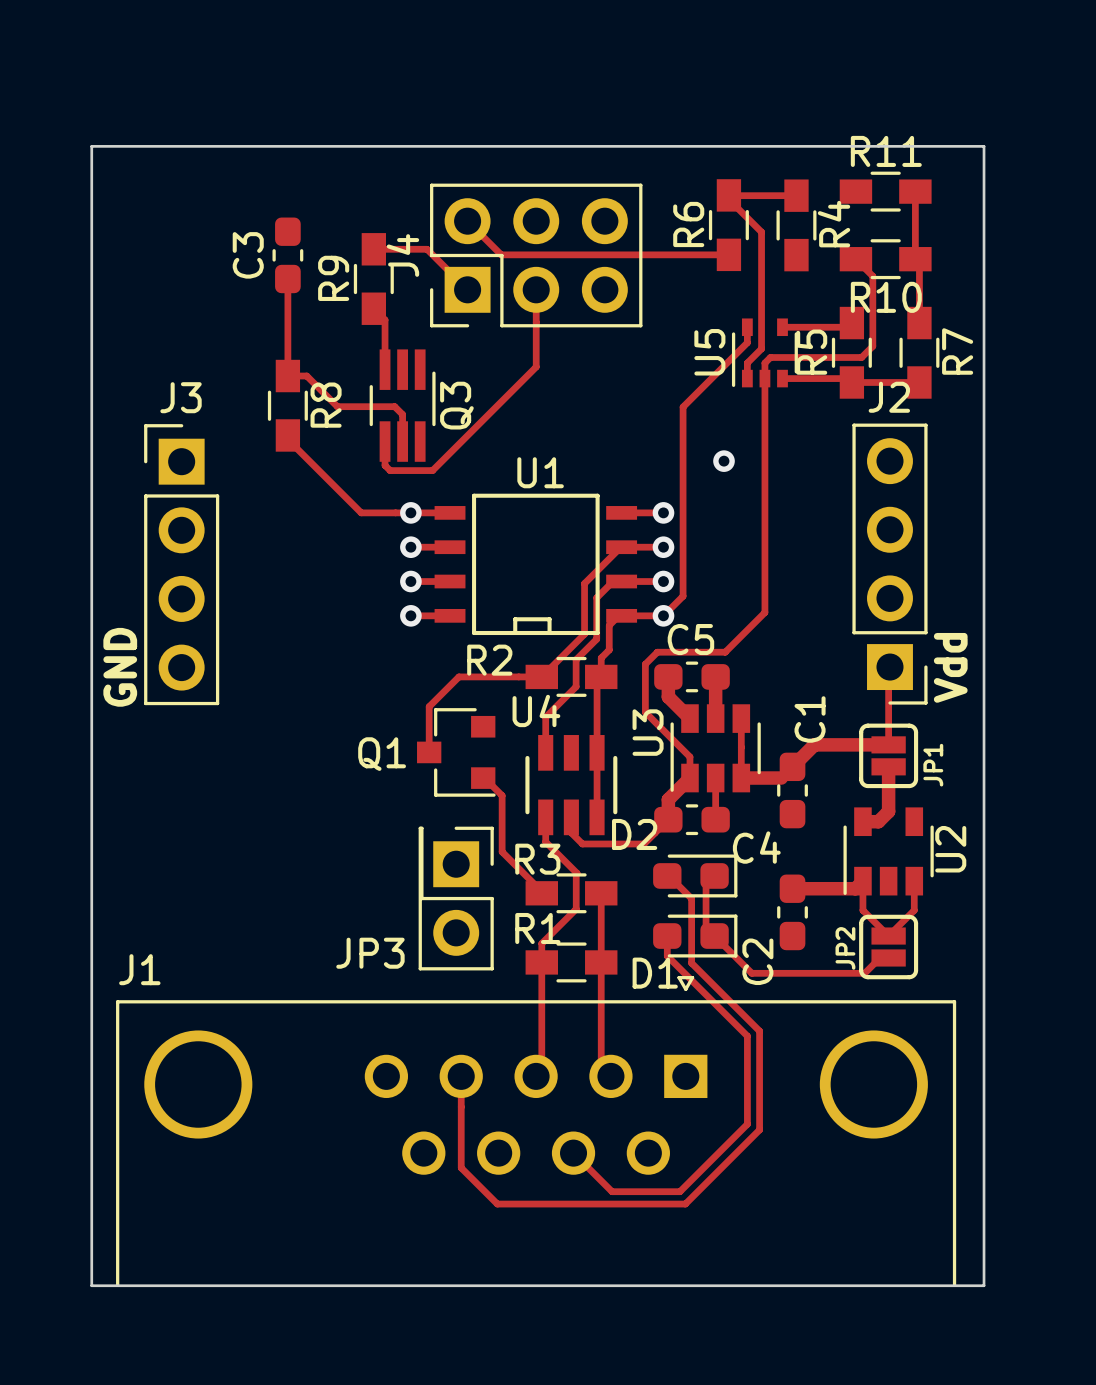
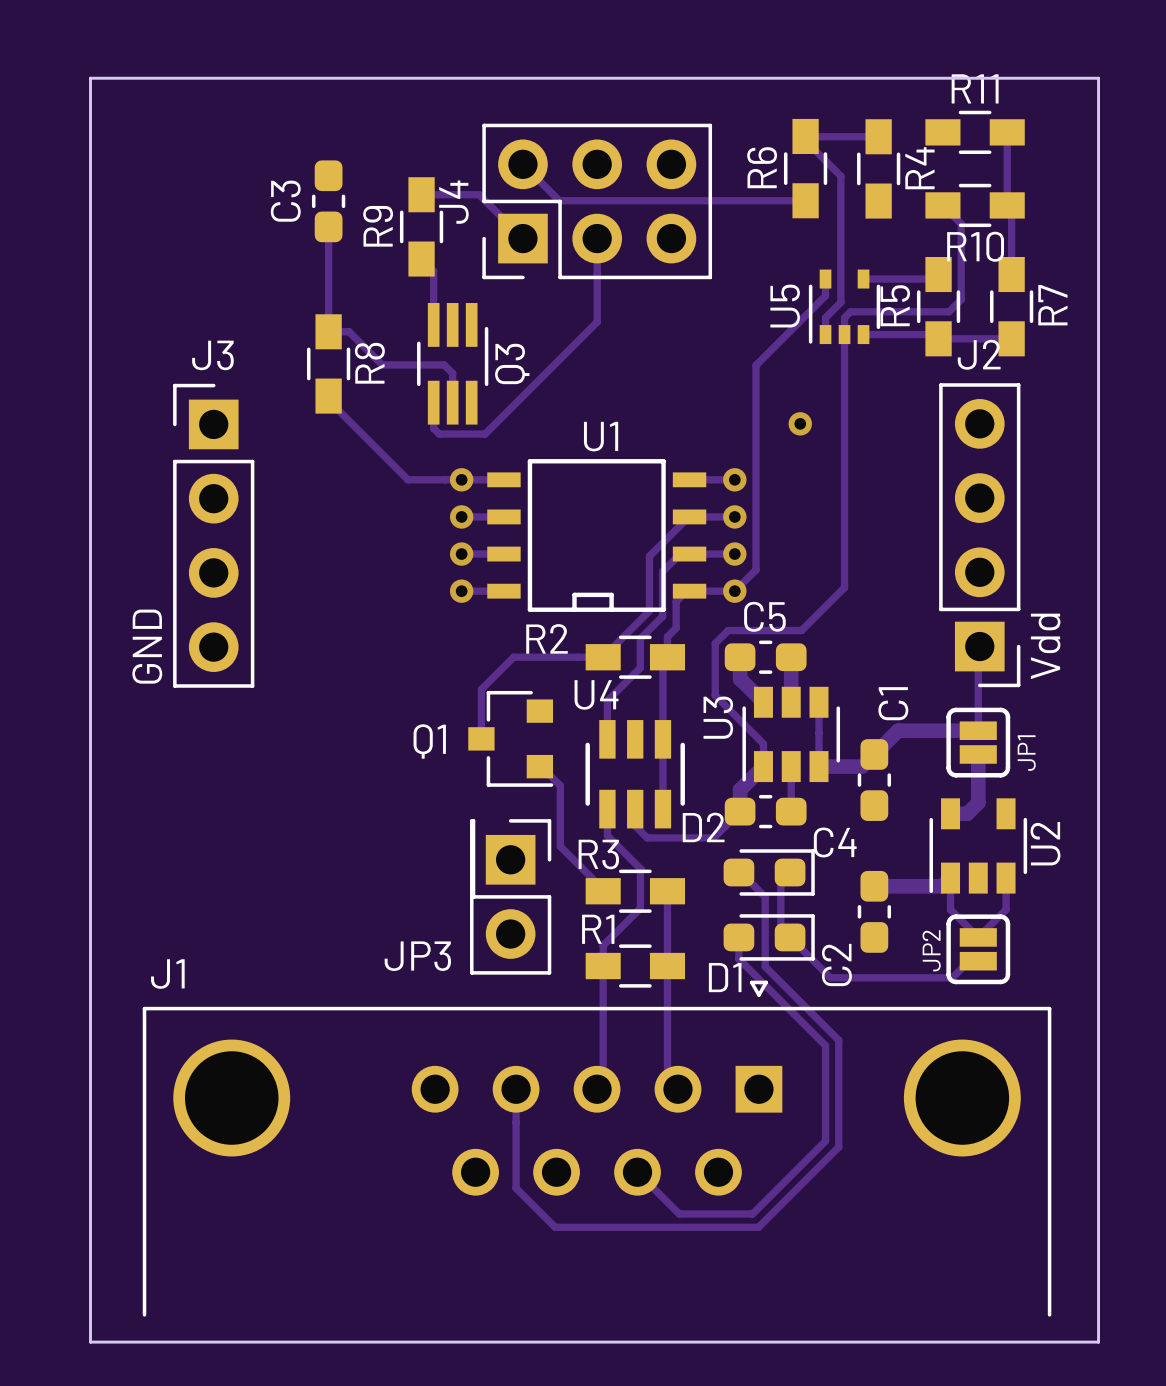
board edge: (91, 146) (91, 1285) (984, 1285) (984, 146) (91, 146) -> (90, 78) (90, 1342) (1098, 1342) (1098, 78) (90, 78)

